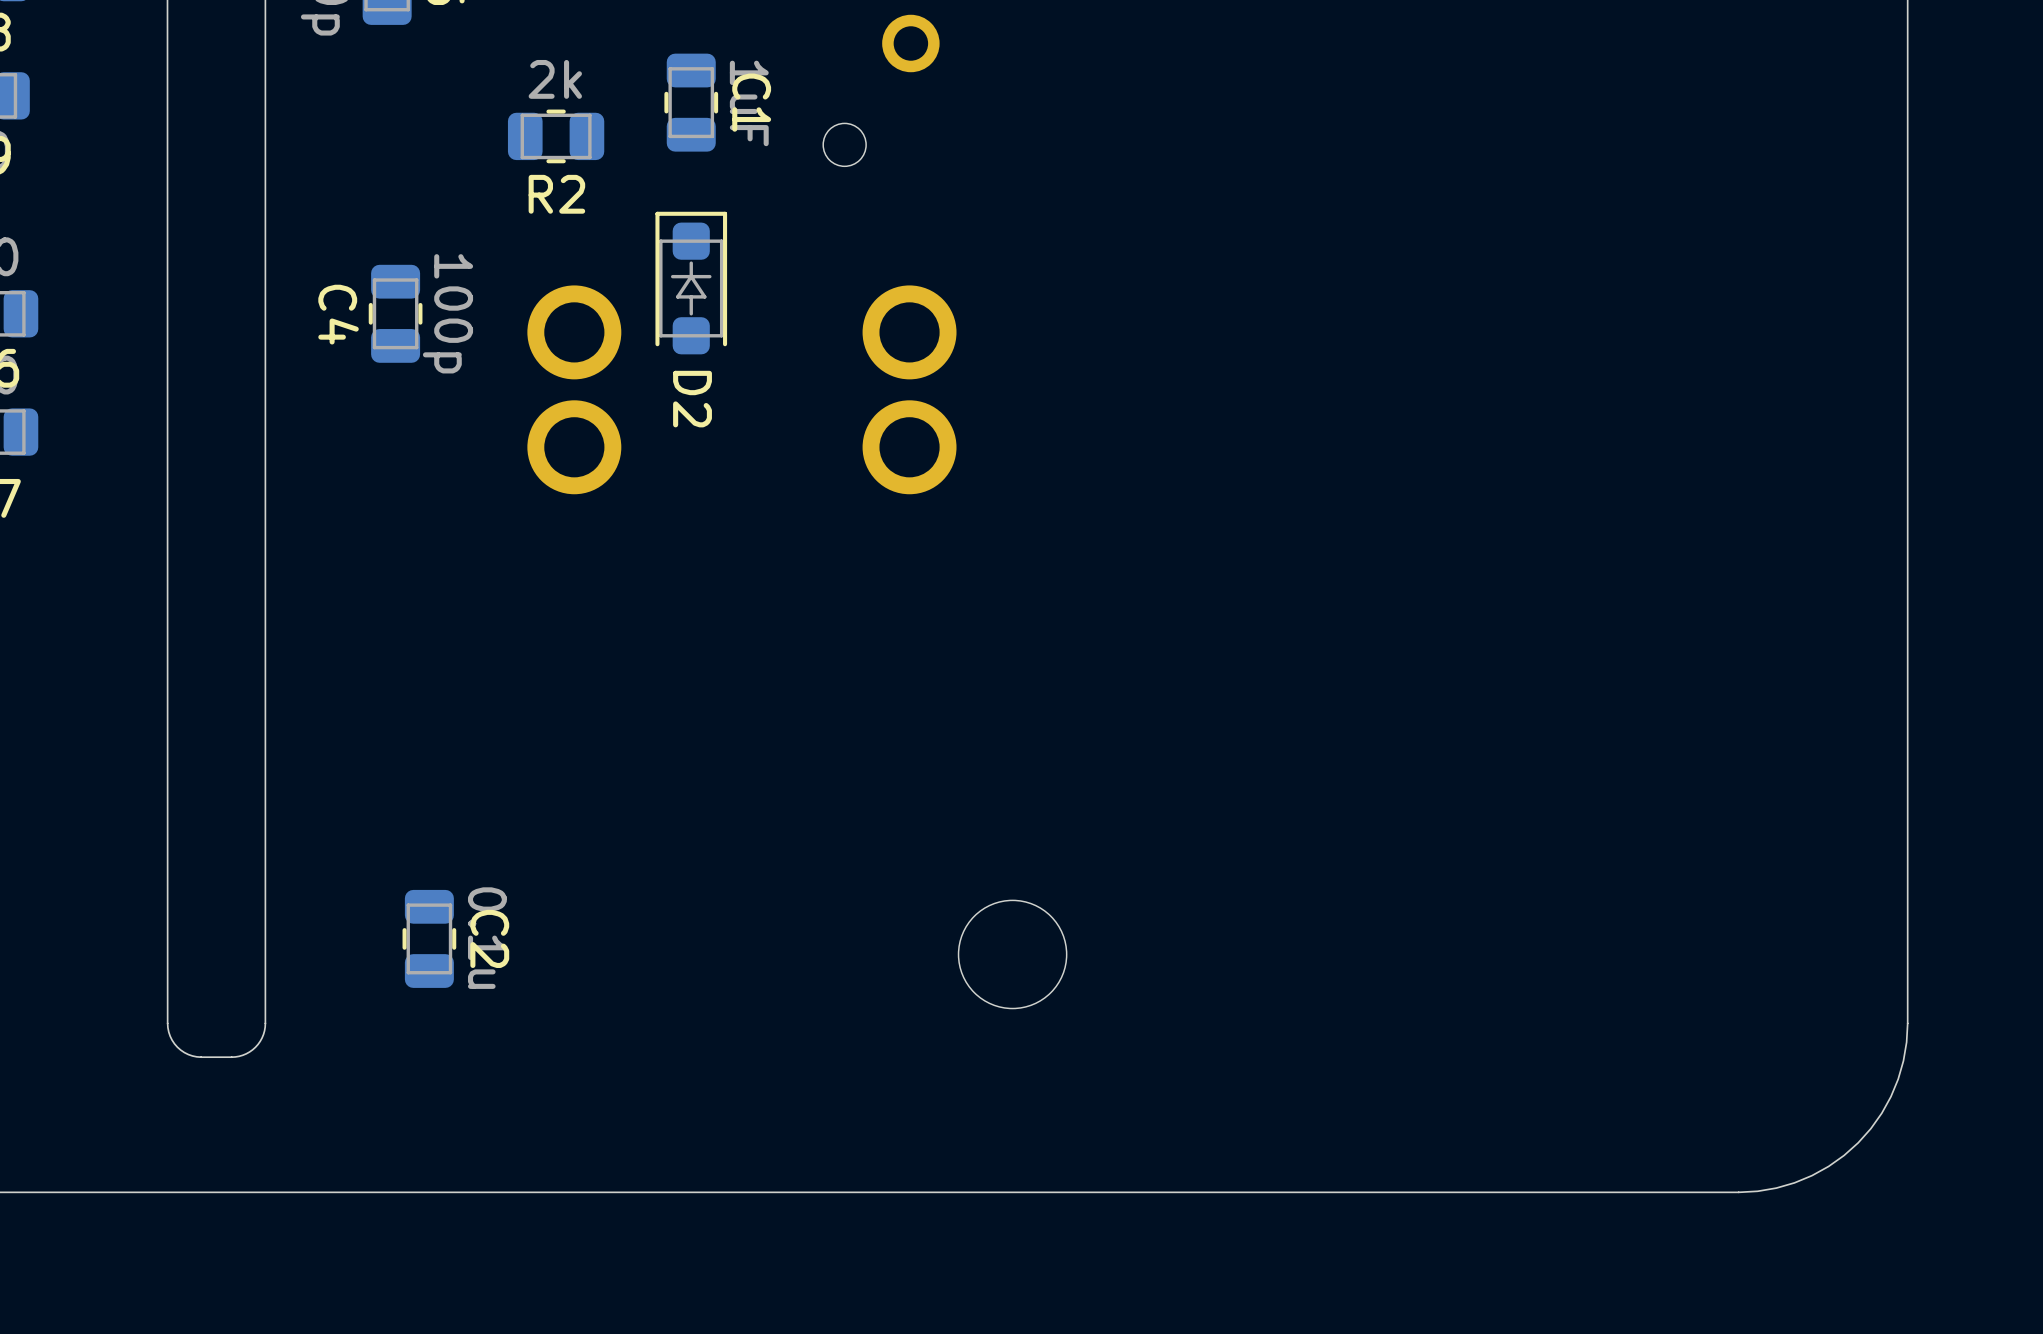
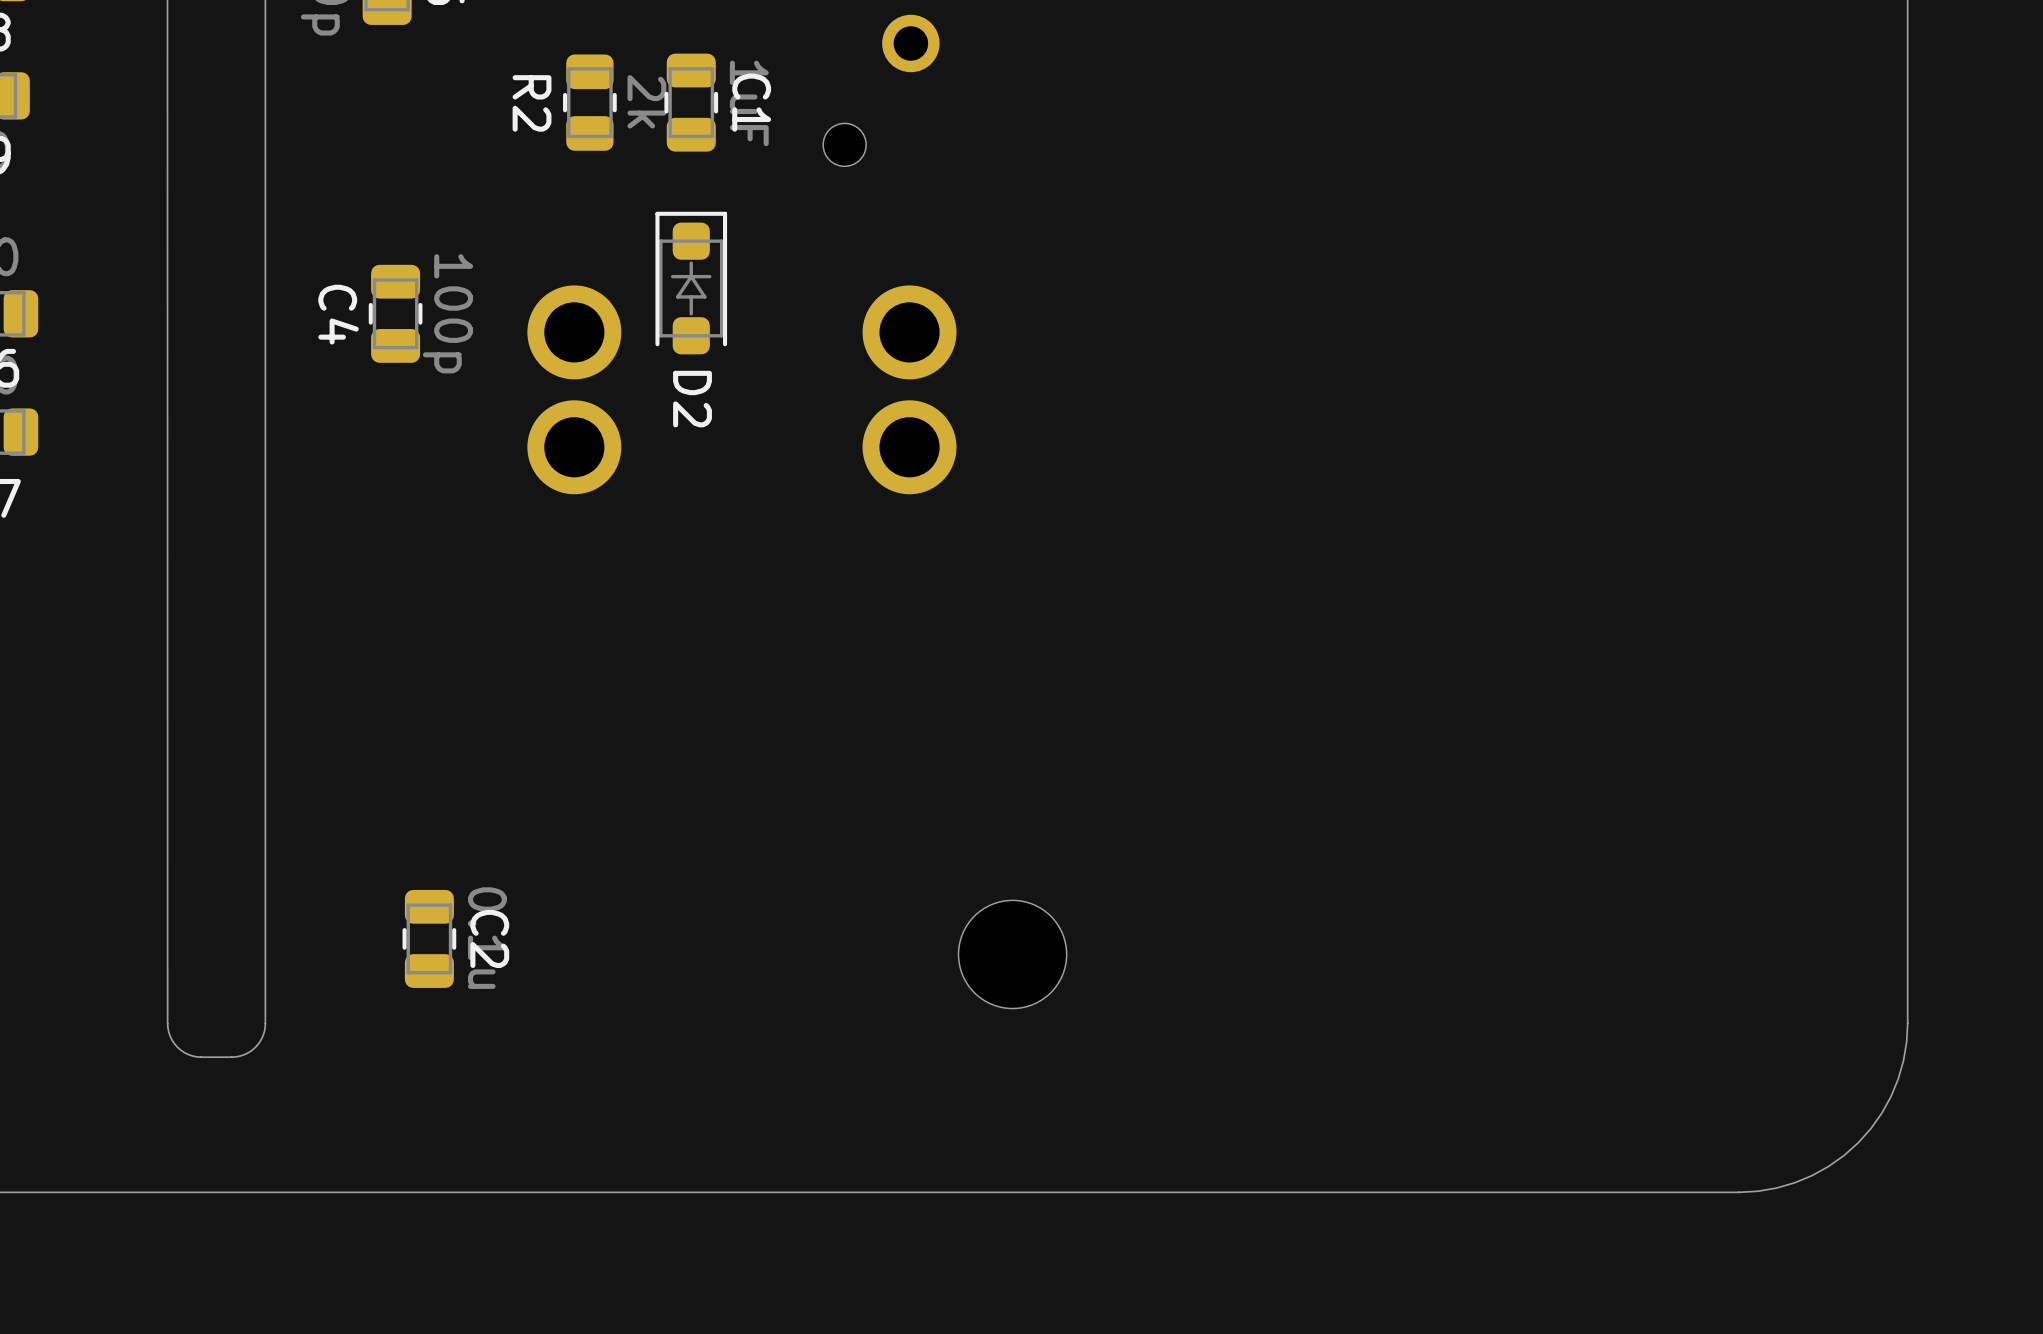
R2 rotation: 0° (556, 136) -> 90° clockwise (589, 102)

